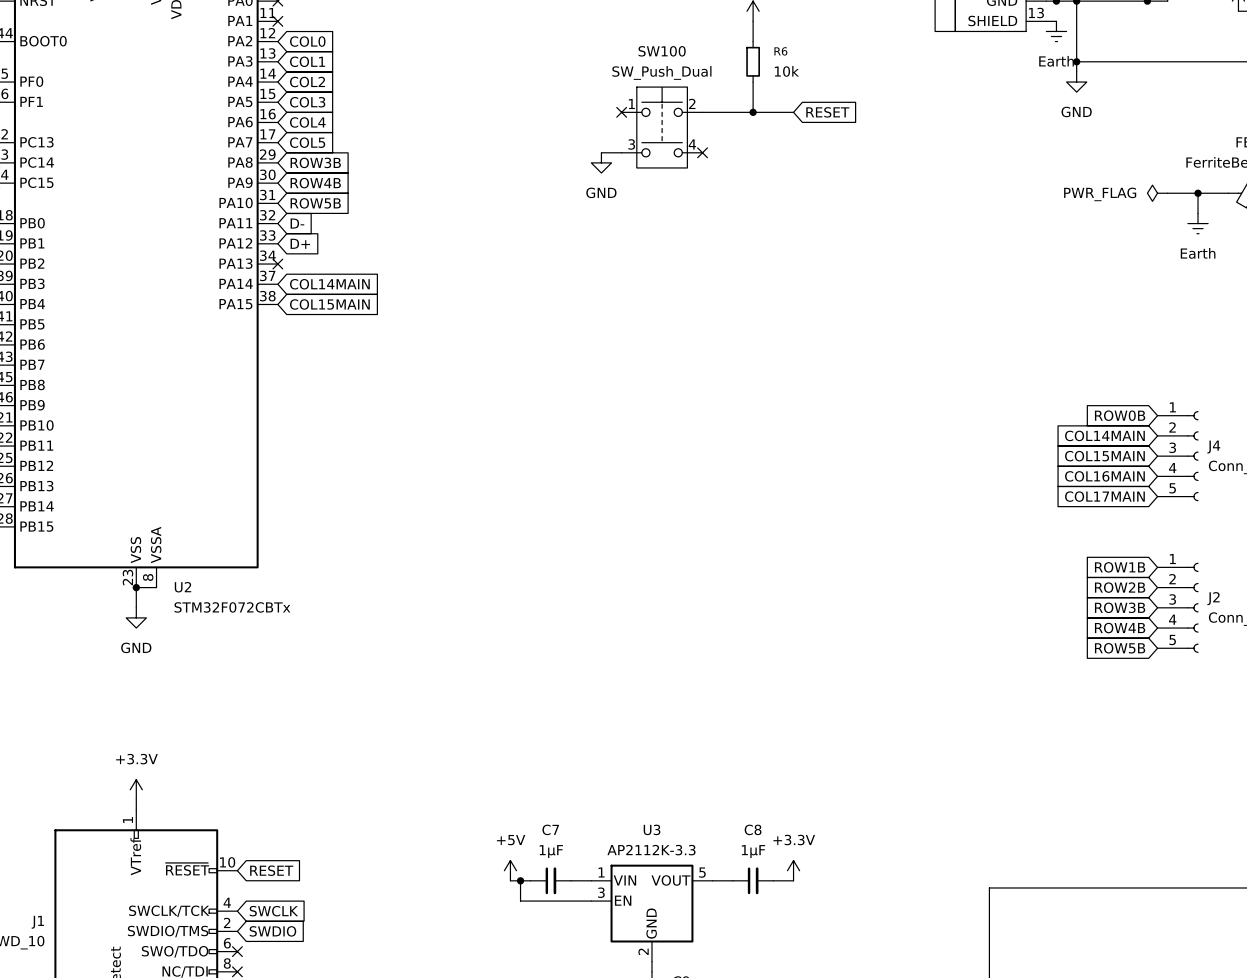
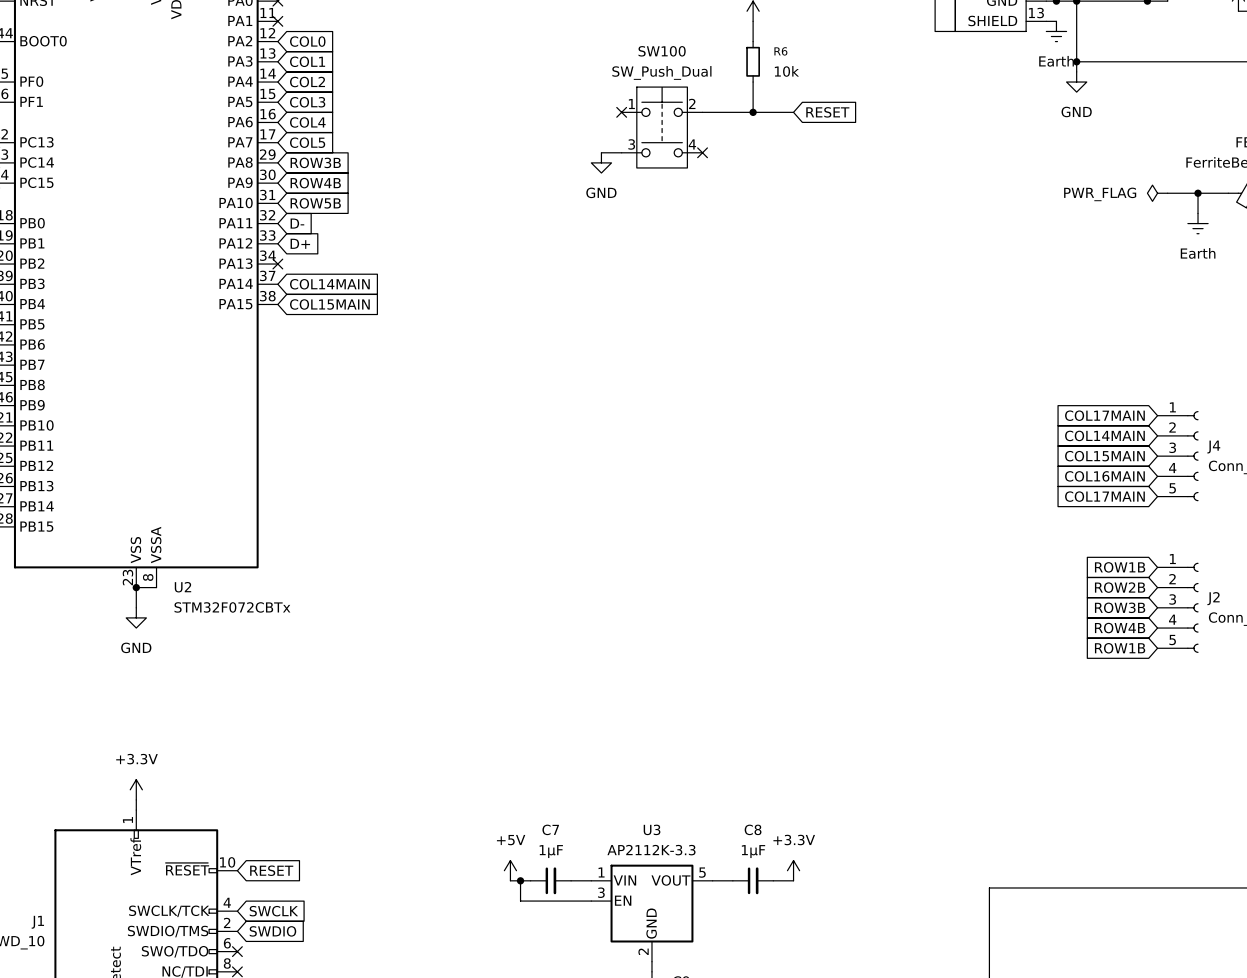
global label: ROW0B (1120, 415) -> COL17MAIN (1104, 415)
global label: ROW5B (1120, 648) -> ROW1B (1120, 648)

